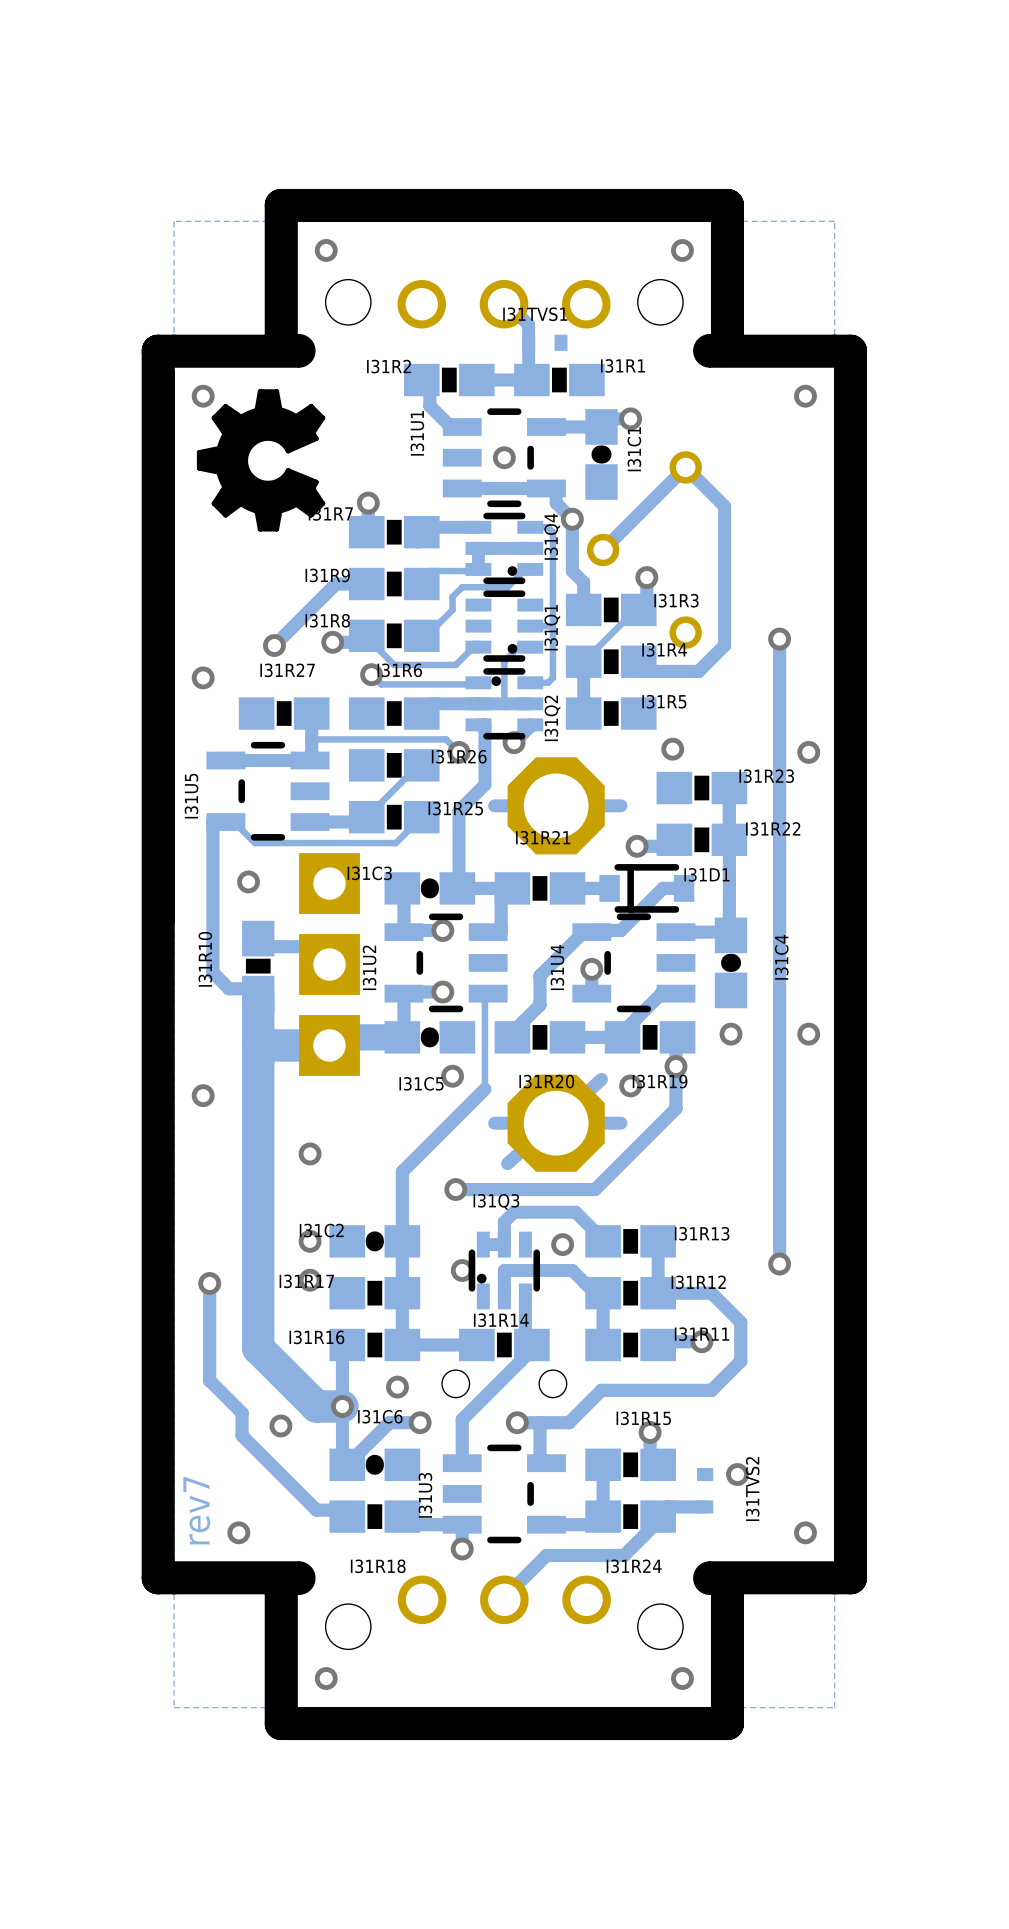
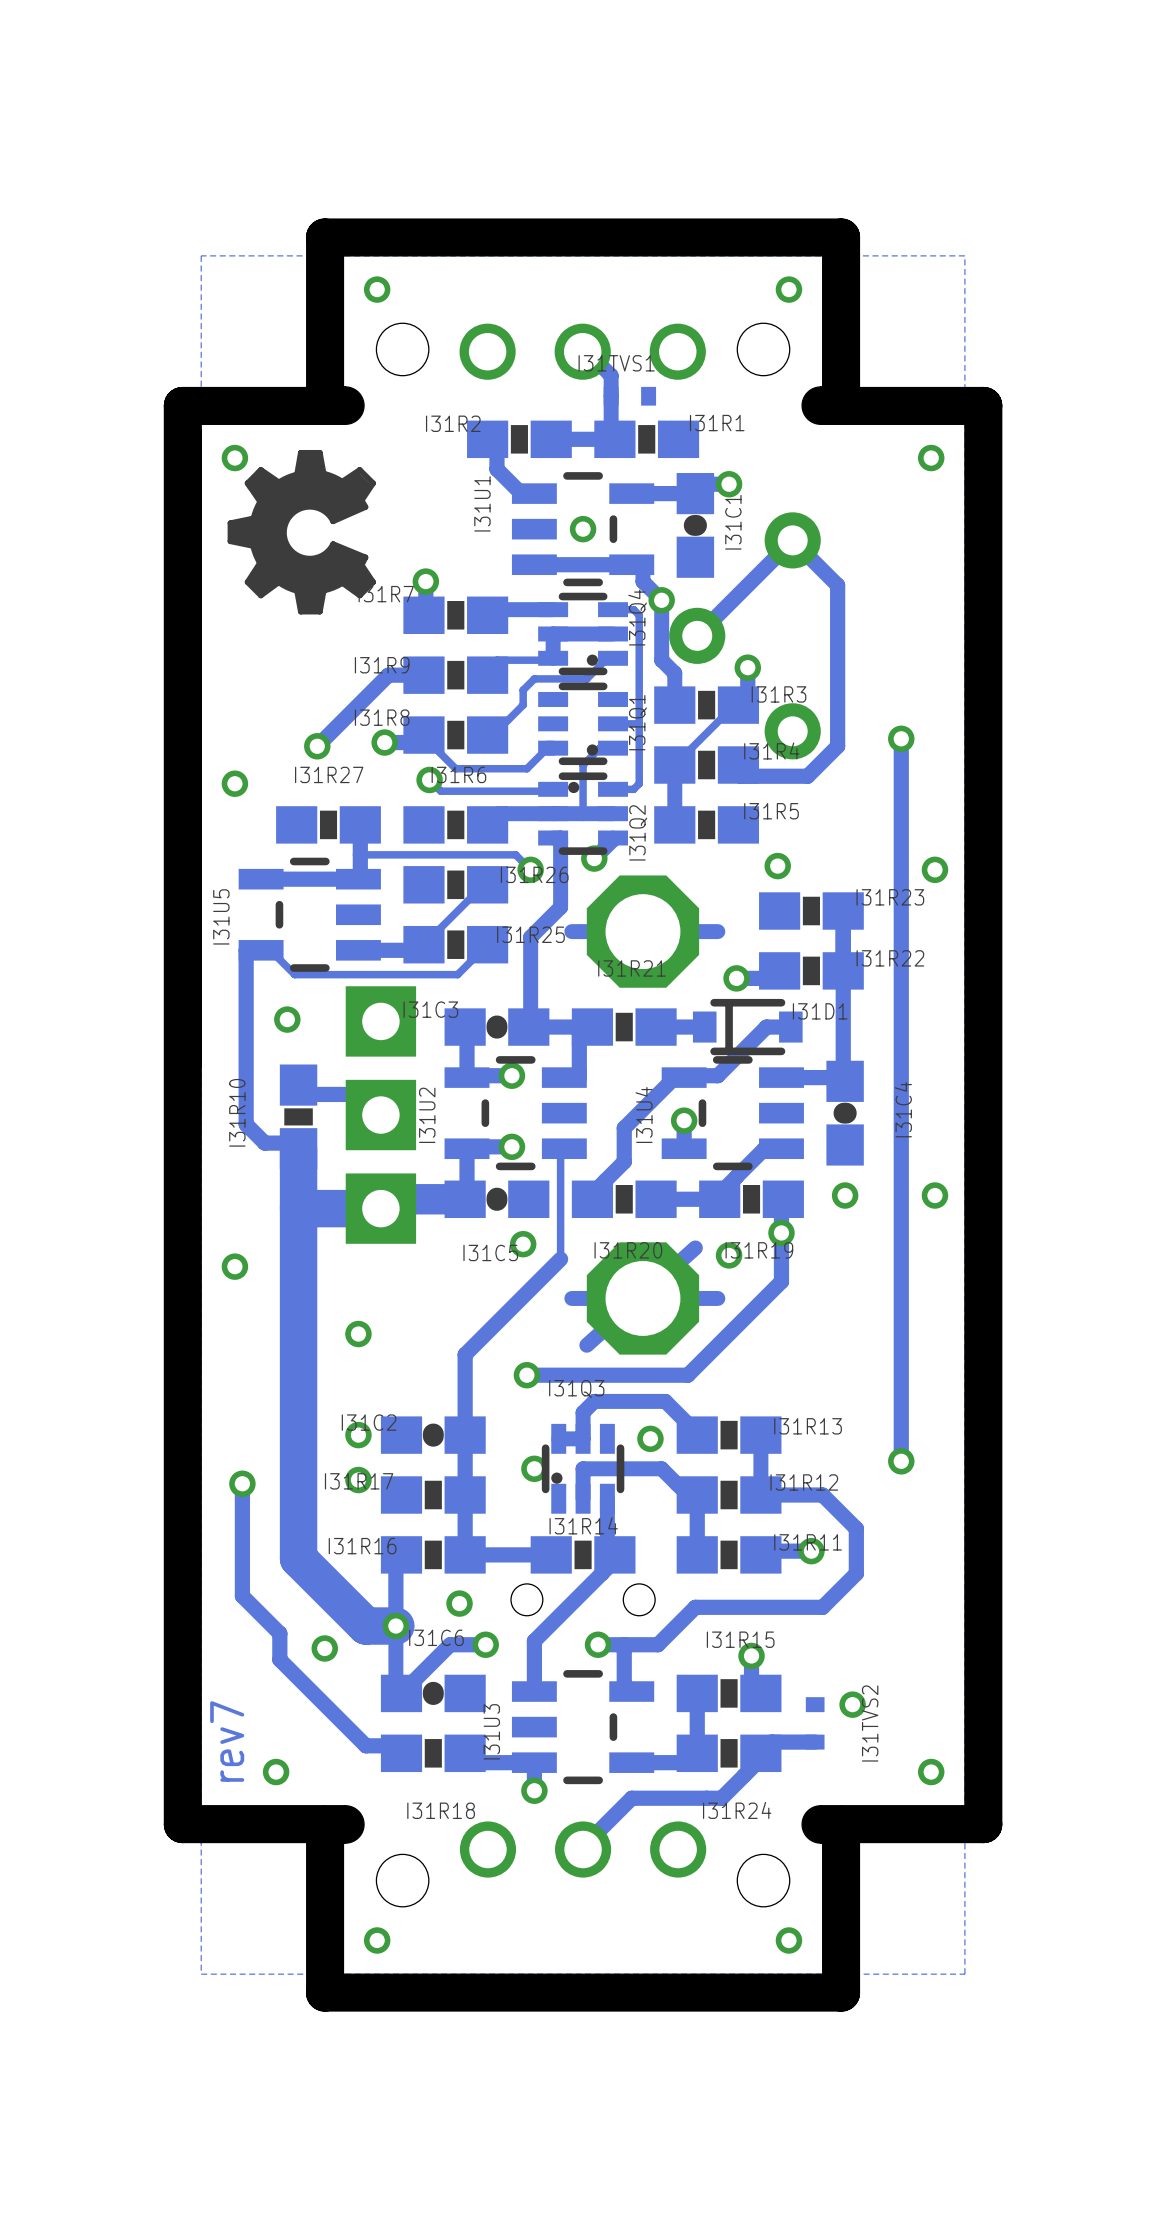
part footprint: [586, 451, 702, 649] -> [669, 512, 821, 760]

